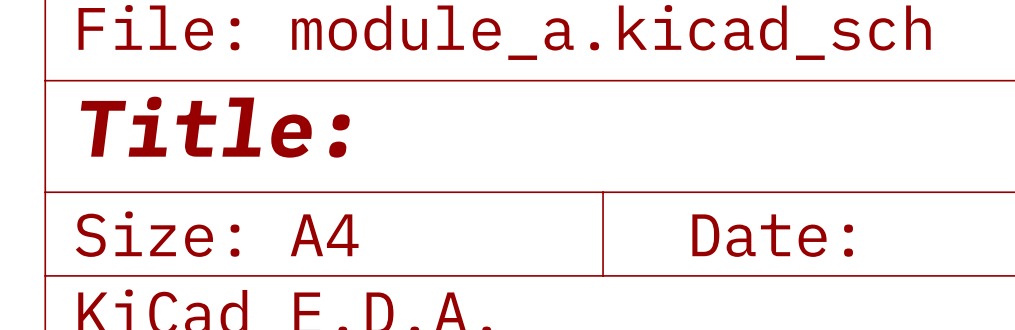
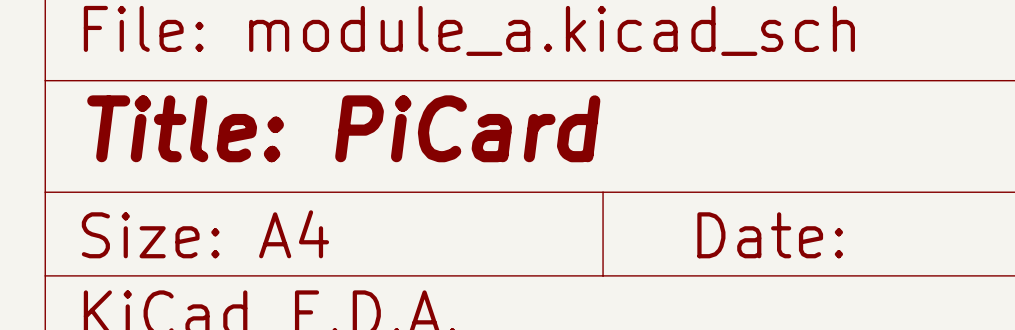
title block: Title: (215, 127) -> Title: PiCard (343, 128)

